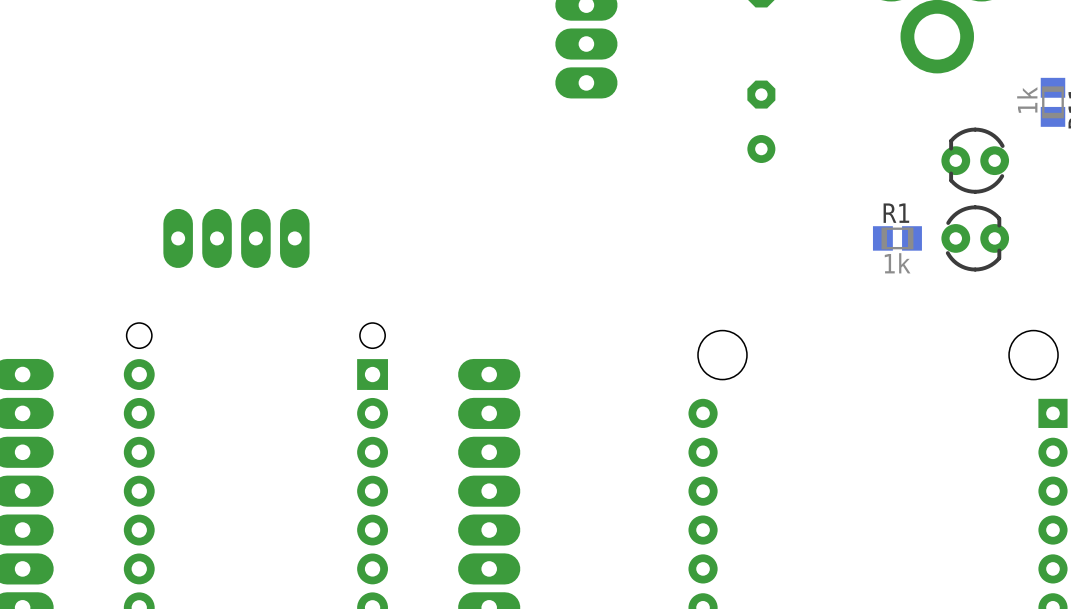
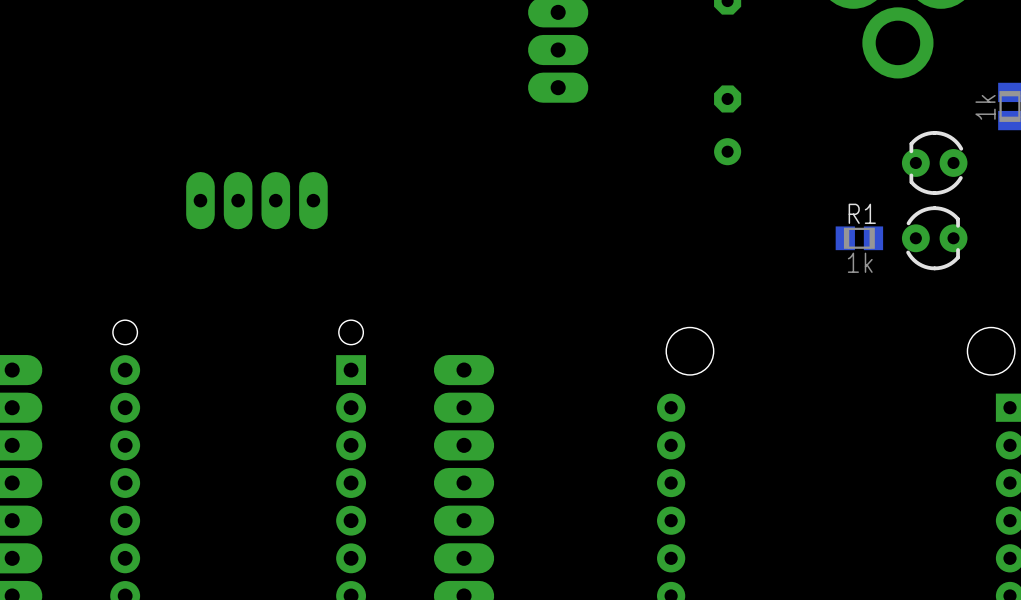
part position: (236, 238) -> (256, 200)

